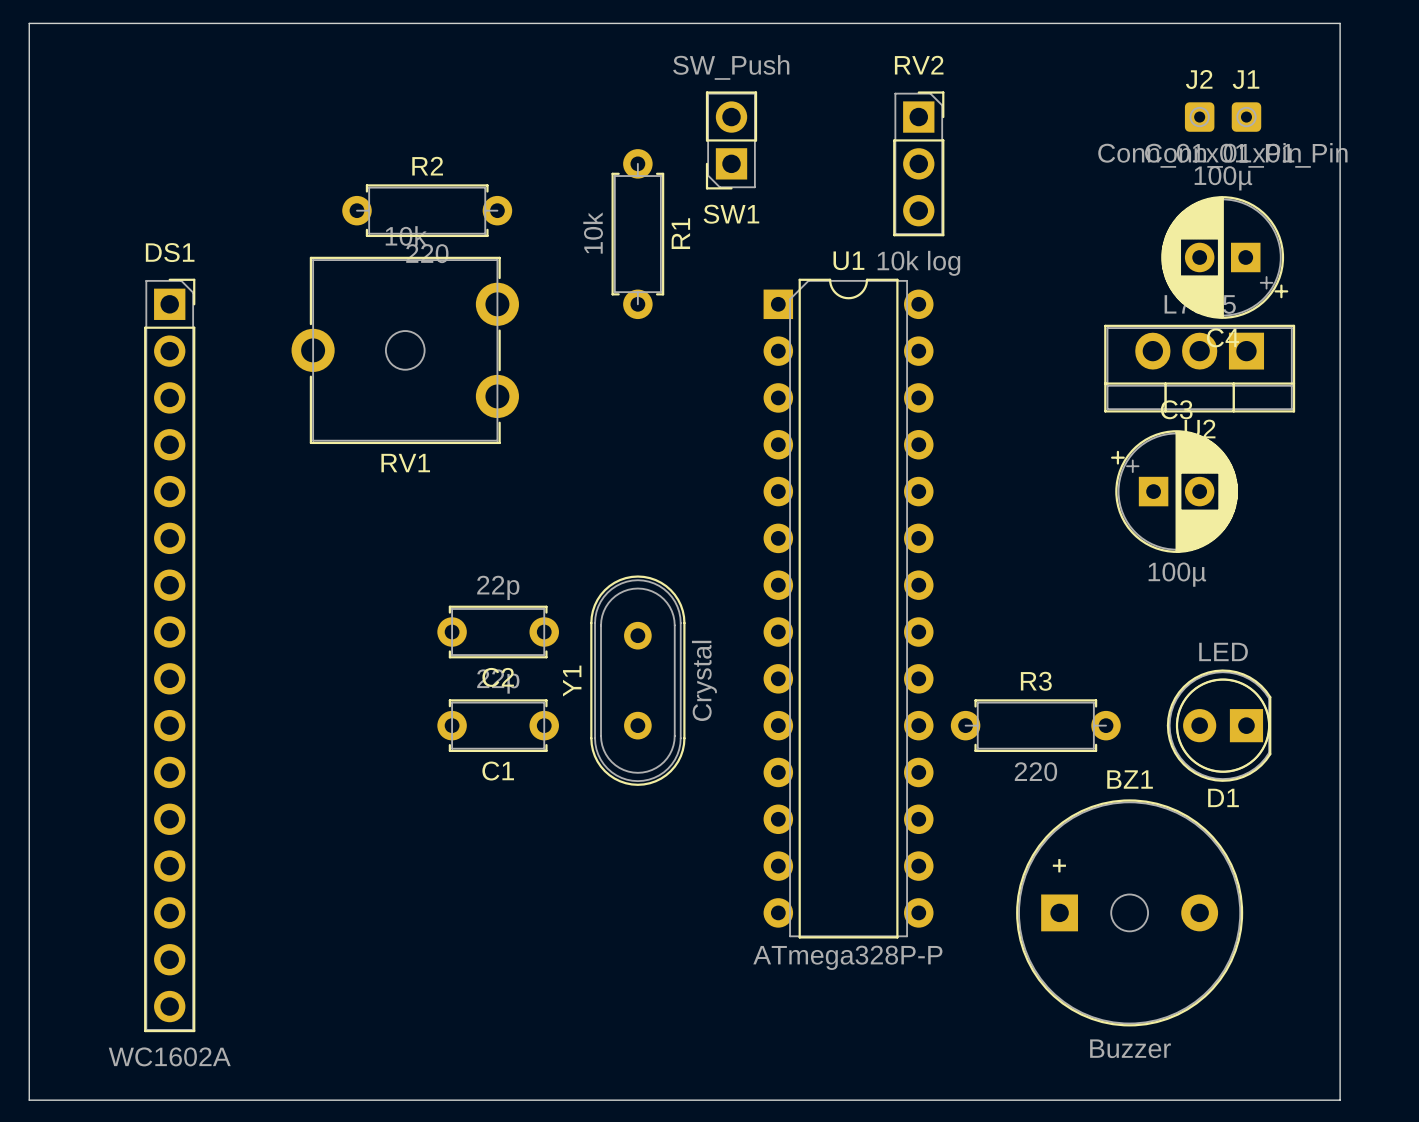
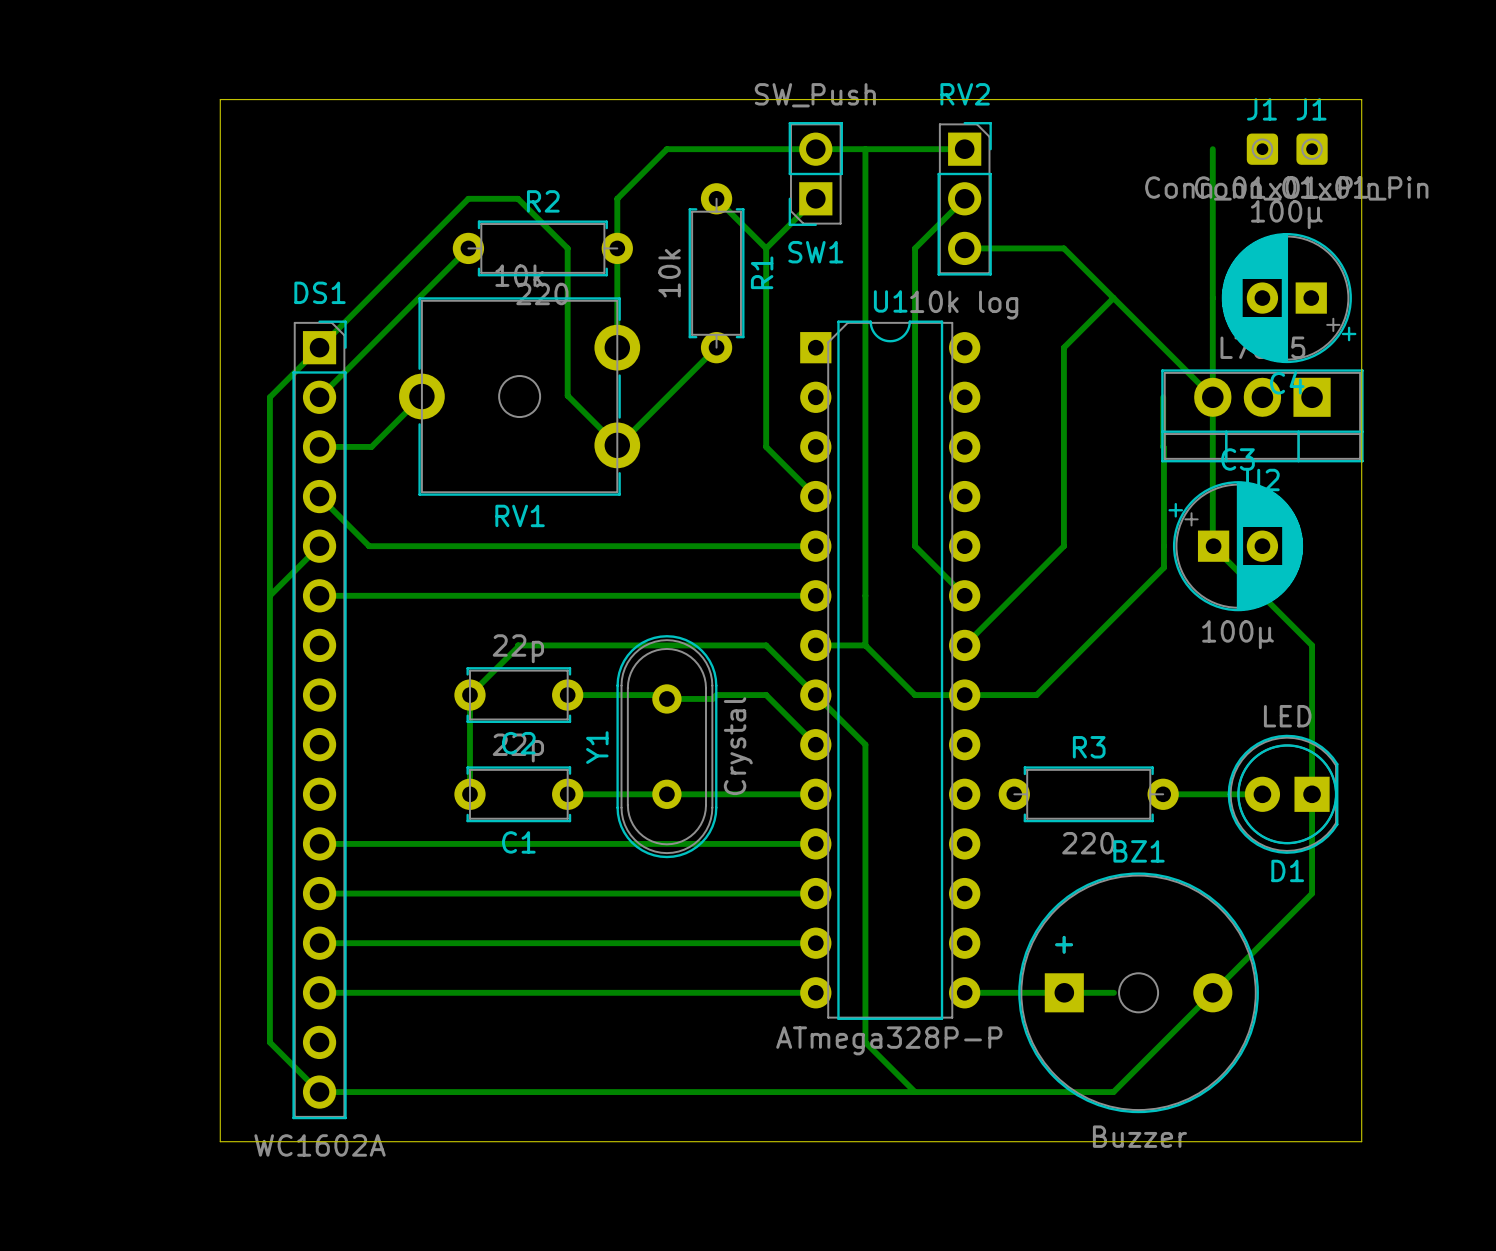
board edge: (29, 23) (1340, 23) (1340, 1100) (29, 1100) (29, 23) -> (220, 99) (220, 1141) (1361, 1141) (1361, 99) (220, 99)
J2 name: J2 (1199, 79) -> J1 (1261, 109)
bottom track: none -> (865, 149) (865, 645)
bottom track: none -> (964, 149) (666, 149) (617, 198) (617, 347)
bottom track: none -> (1212, 149) (1212, 546) (1312, 645) (1312, 893) (1113, 1092) (319, 1092) (269, 1042) (269, 397) (468, 198) (518, 198) (567, 248) (567, 395) (617, 445) (716, 347)
SW1 position: (731, 140) -> (815, 173)
bottom track: none -> (716, 198) (766, 248)
bottom track: none -> (815, 198) (766, 248)
bottom track: none -> (964, 198) (915, 248) (915, 546) (964, 595)
R2 position: (427, 210) -> (542, 248)
bottom track: none -> (468, 248) (319, 397)
bottom track: none -> (766, 248) (766, 446) (815, 496)
bottom track: none -> (964, 248) (1063, 248) (1212, 397)
R1 position: (637, 234) -> (716, 273)
bottom track: none -> (1113, 298) (1063, 347) (1063, 546) (964, 645)
RV1 position: (405, 350) -> (519, 396)
bottom track: none -> (421, 396) (371, 446) (319, 446)
bottom track: none -> (1163, 397) (1163, 567) (1036, 695) (915, 695) (865, 645)
bottom track: none -> (319, 496) (369, 546) (815, 546)
bottom track: none -> (319, 546) (269, 595)
bottom track: none -> (319, 595) (815, 595)
bottom track: none -> (815, 645) (865, 645)
bottom track: none -> (567, 695) (663, 695) (666, 698) (712, 698) (716, 695) (766, 695) (815, 744)
DS1 position: (169, 655) -> (319, 719)
bottom track: none -> (469, 794) (469, 695) (518, 645) (766, 645) (865, 744) (865, 1042) (915, 1092)
bottom track: none -> (567, 794) (815, 794)
bottom track: none -> (1163, 794) (1262, 794)
bottom track: none -> (319, 843) (815, 843)
bottom track: none -> (319, 893) (815, 893)
bottom track: none -> (319, 943) (815, 943)
bottom track: none -> (319, 992) (815, 992)
bottom track: none -> (964, 992) (1113, 992)
BZ1 position: (1129, 912) -> (1138, 992)

